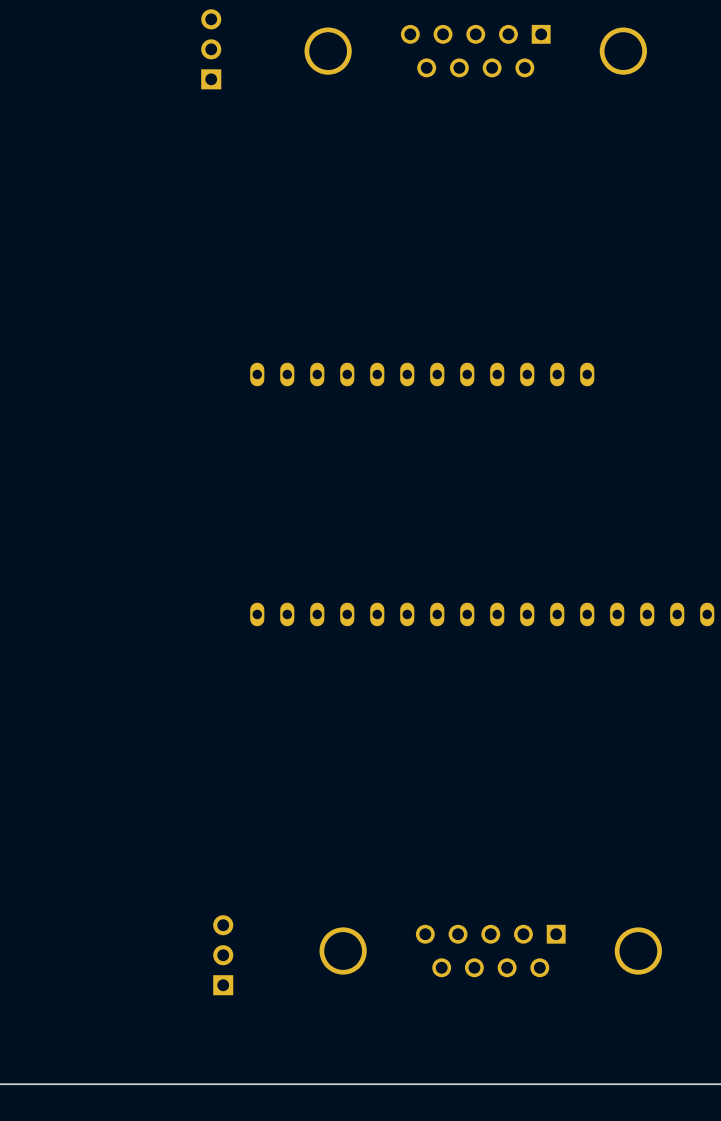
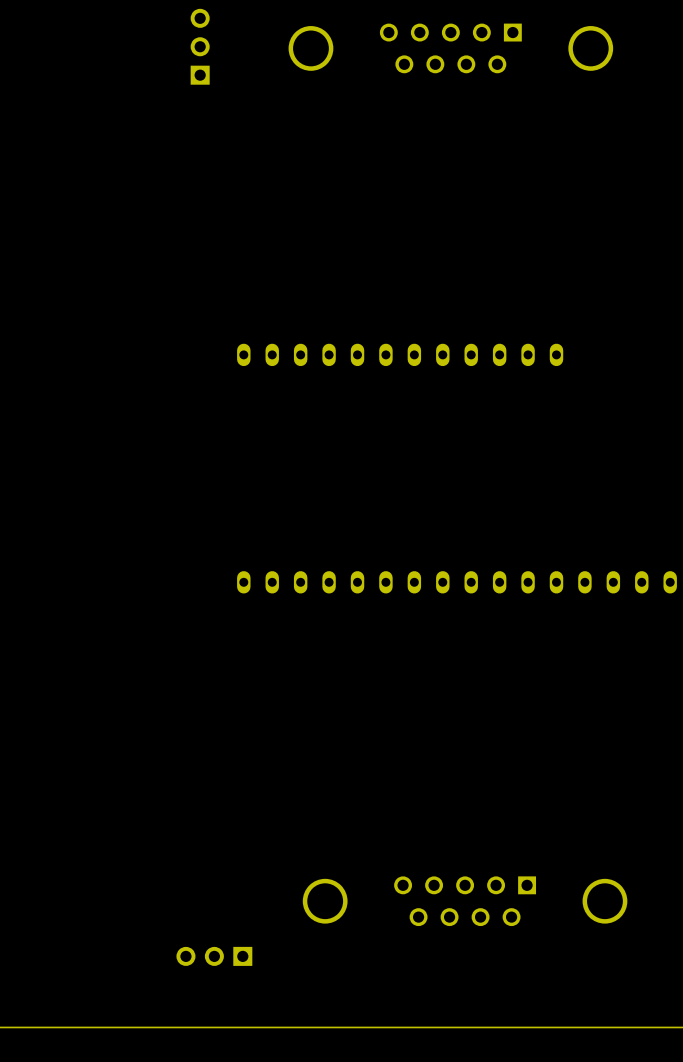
part rotation: 0° (223, 955) -> 90° counterclockwise (214, 956)
part position: (223, 955) -> (214, 956)

